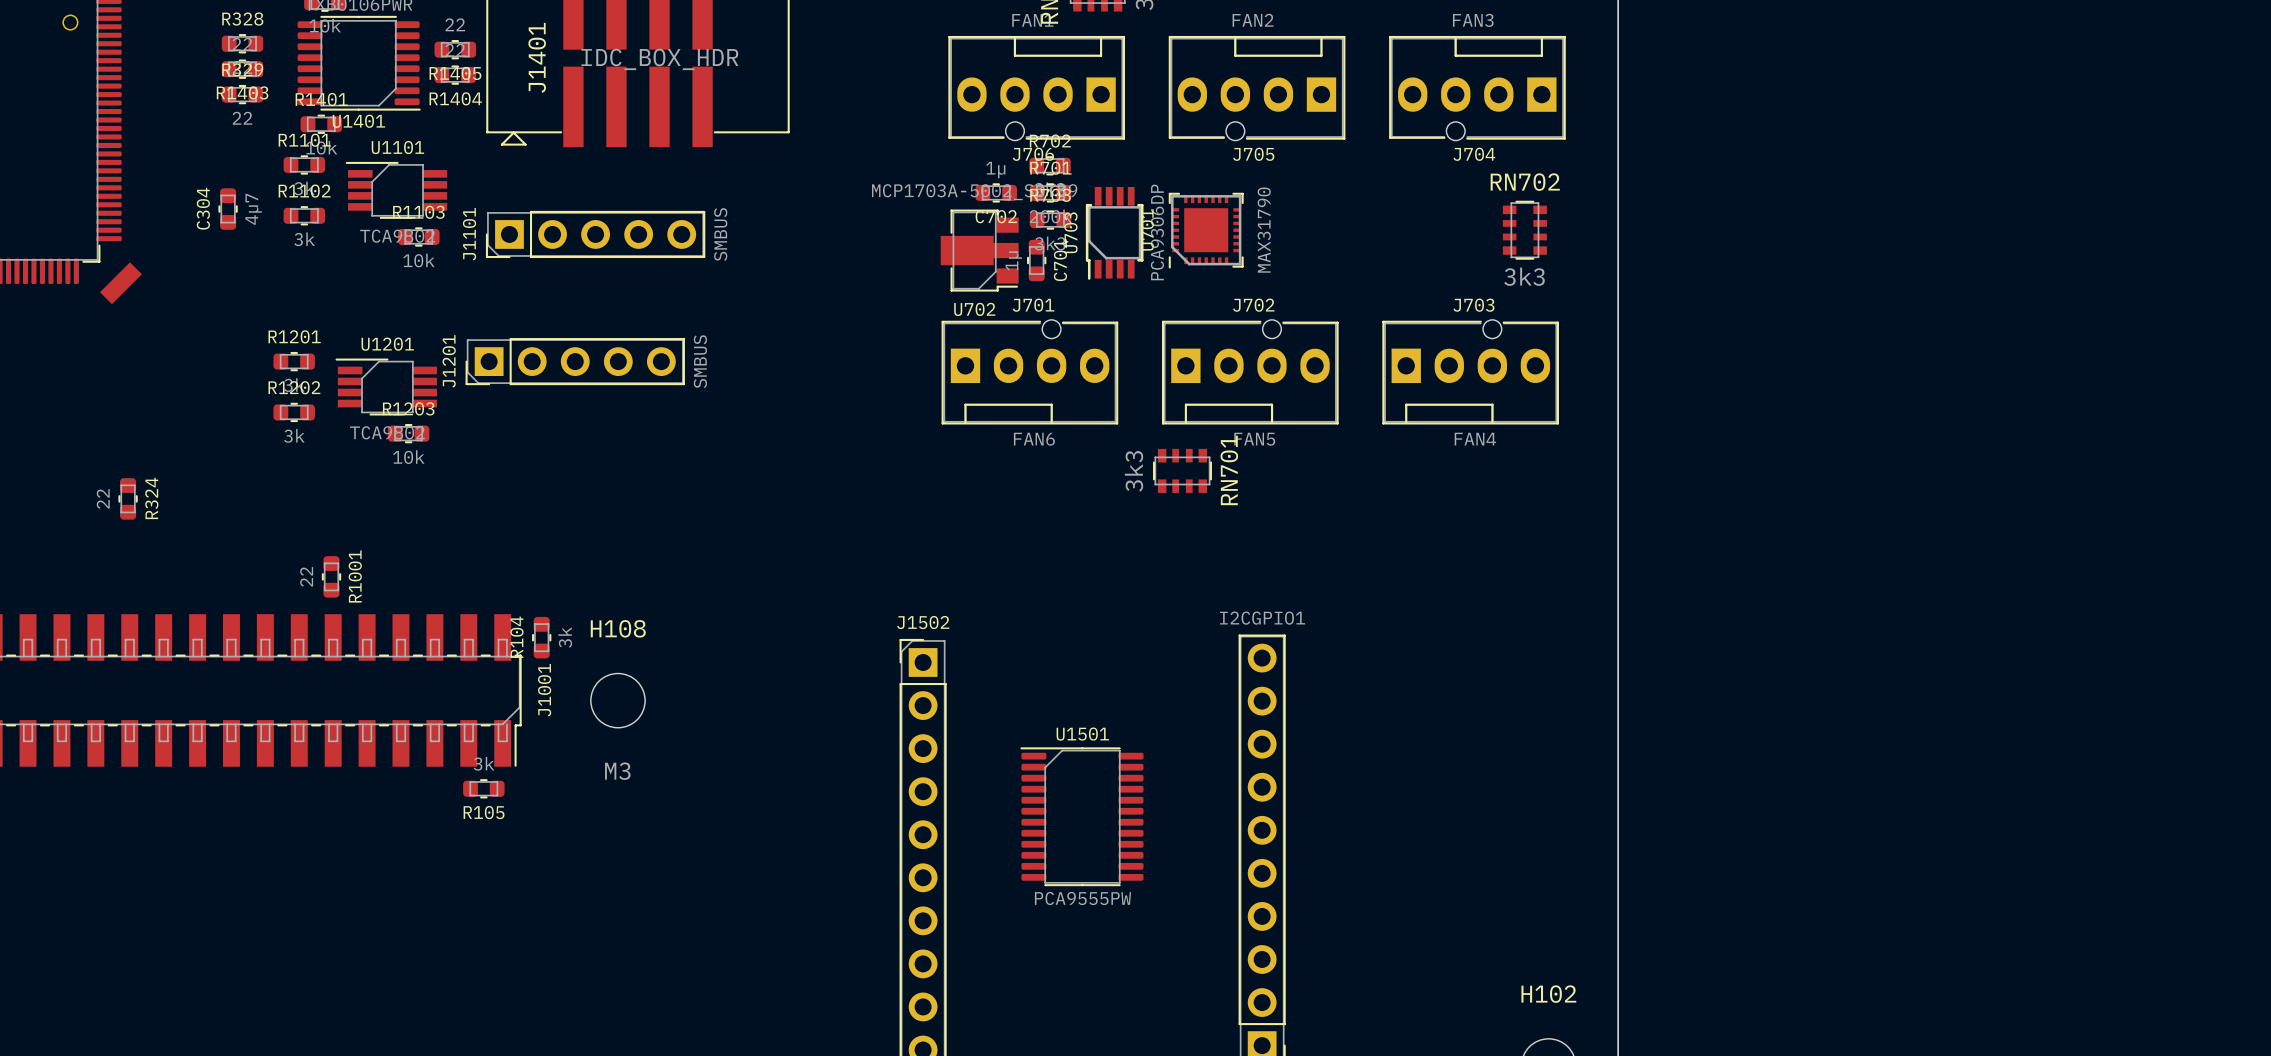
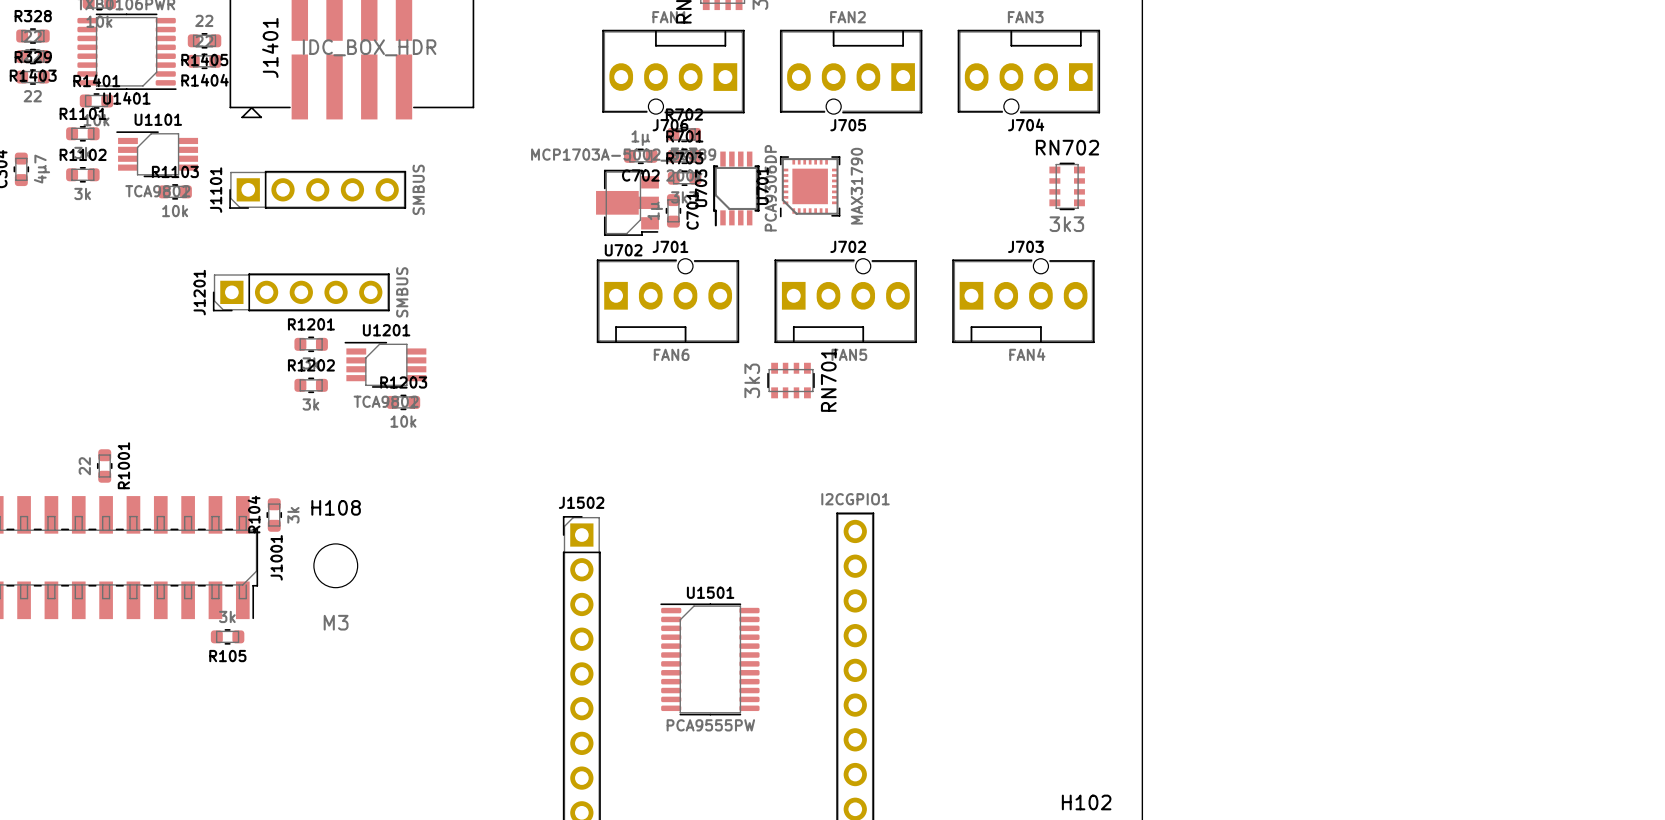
R1201 position: (294, 361) -> (311, 344)
U1201 position: (386, 387) -> (385, 364)
R1202 position: (294, 412) -> (311, 385)
R1203 position: (408, 433) -> (403, 402)

